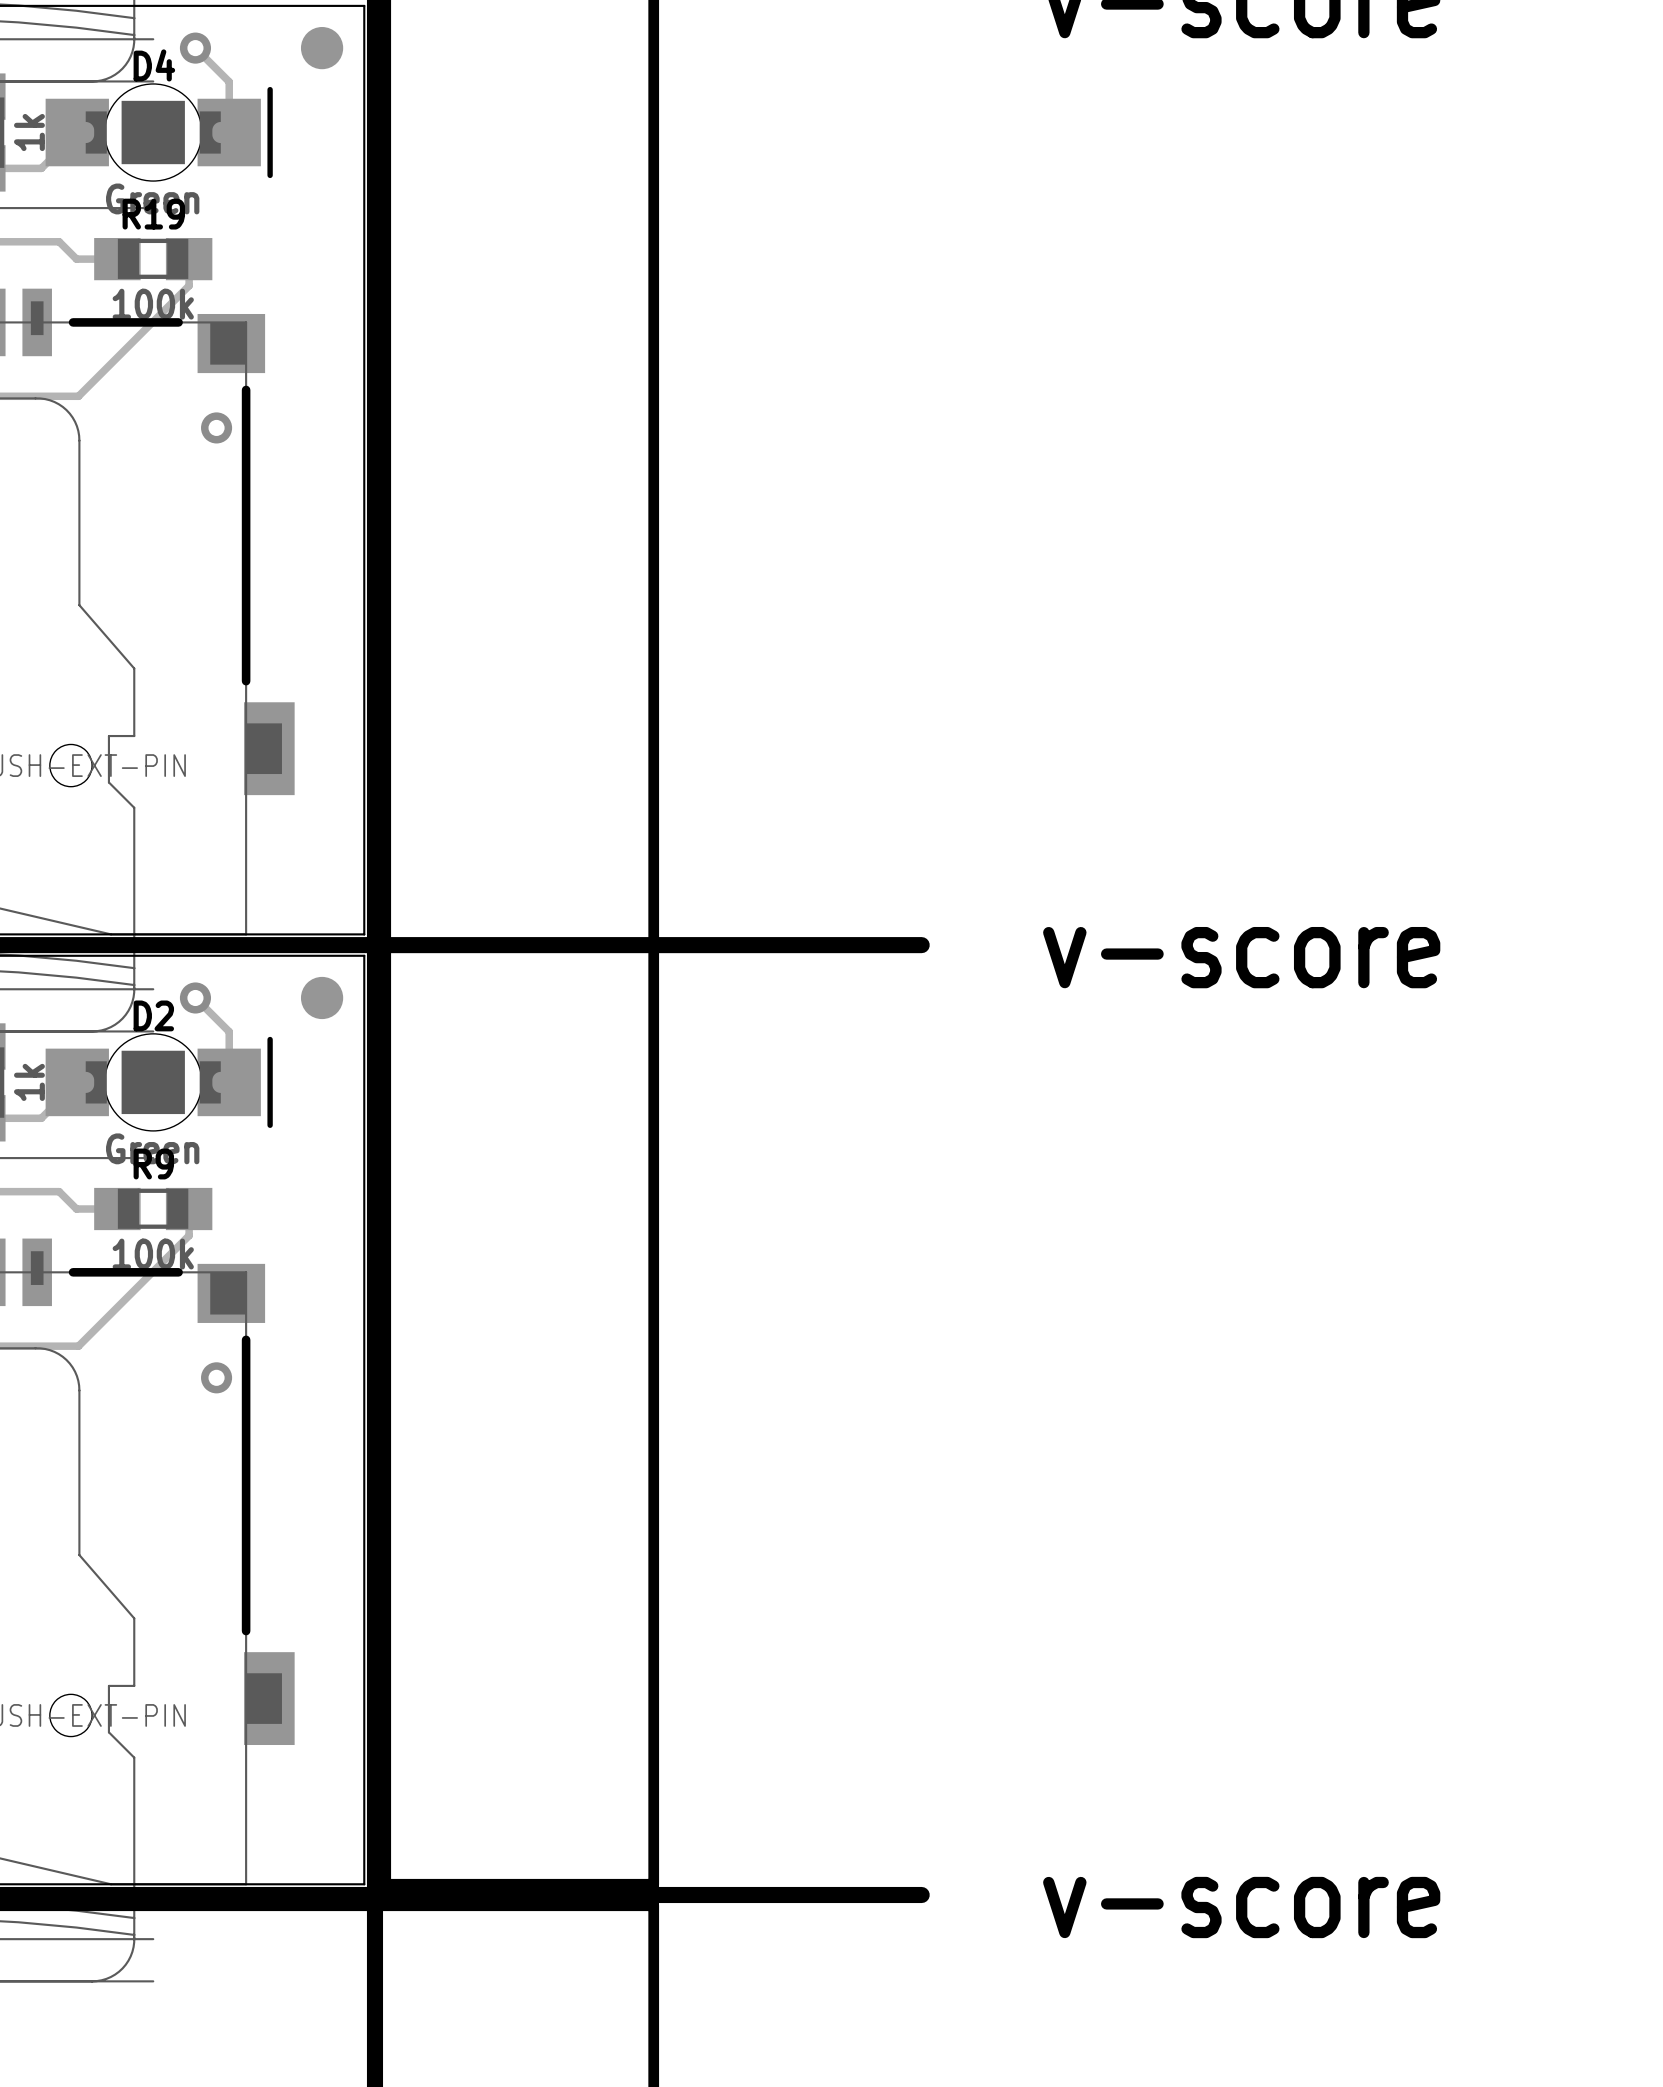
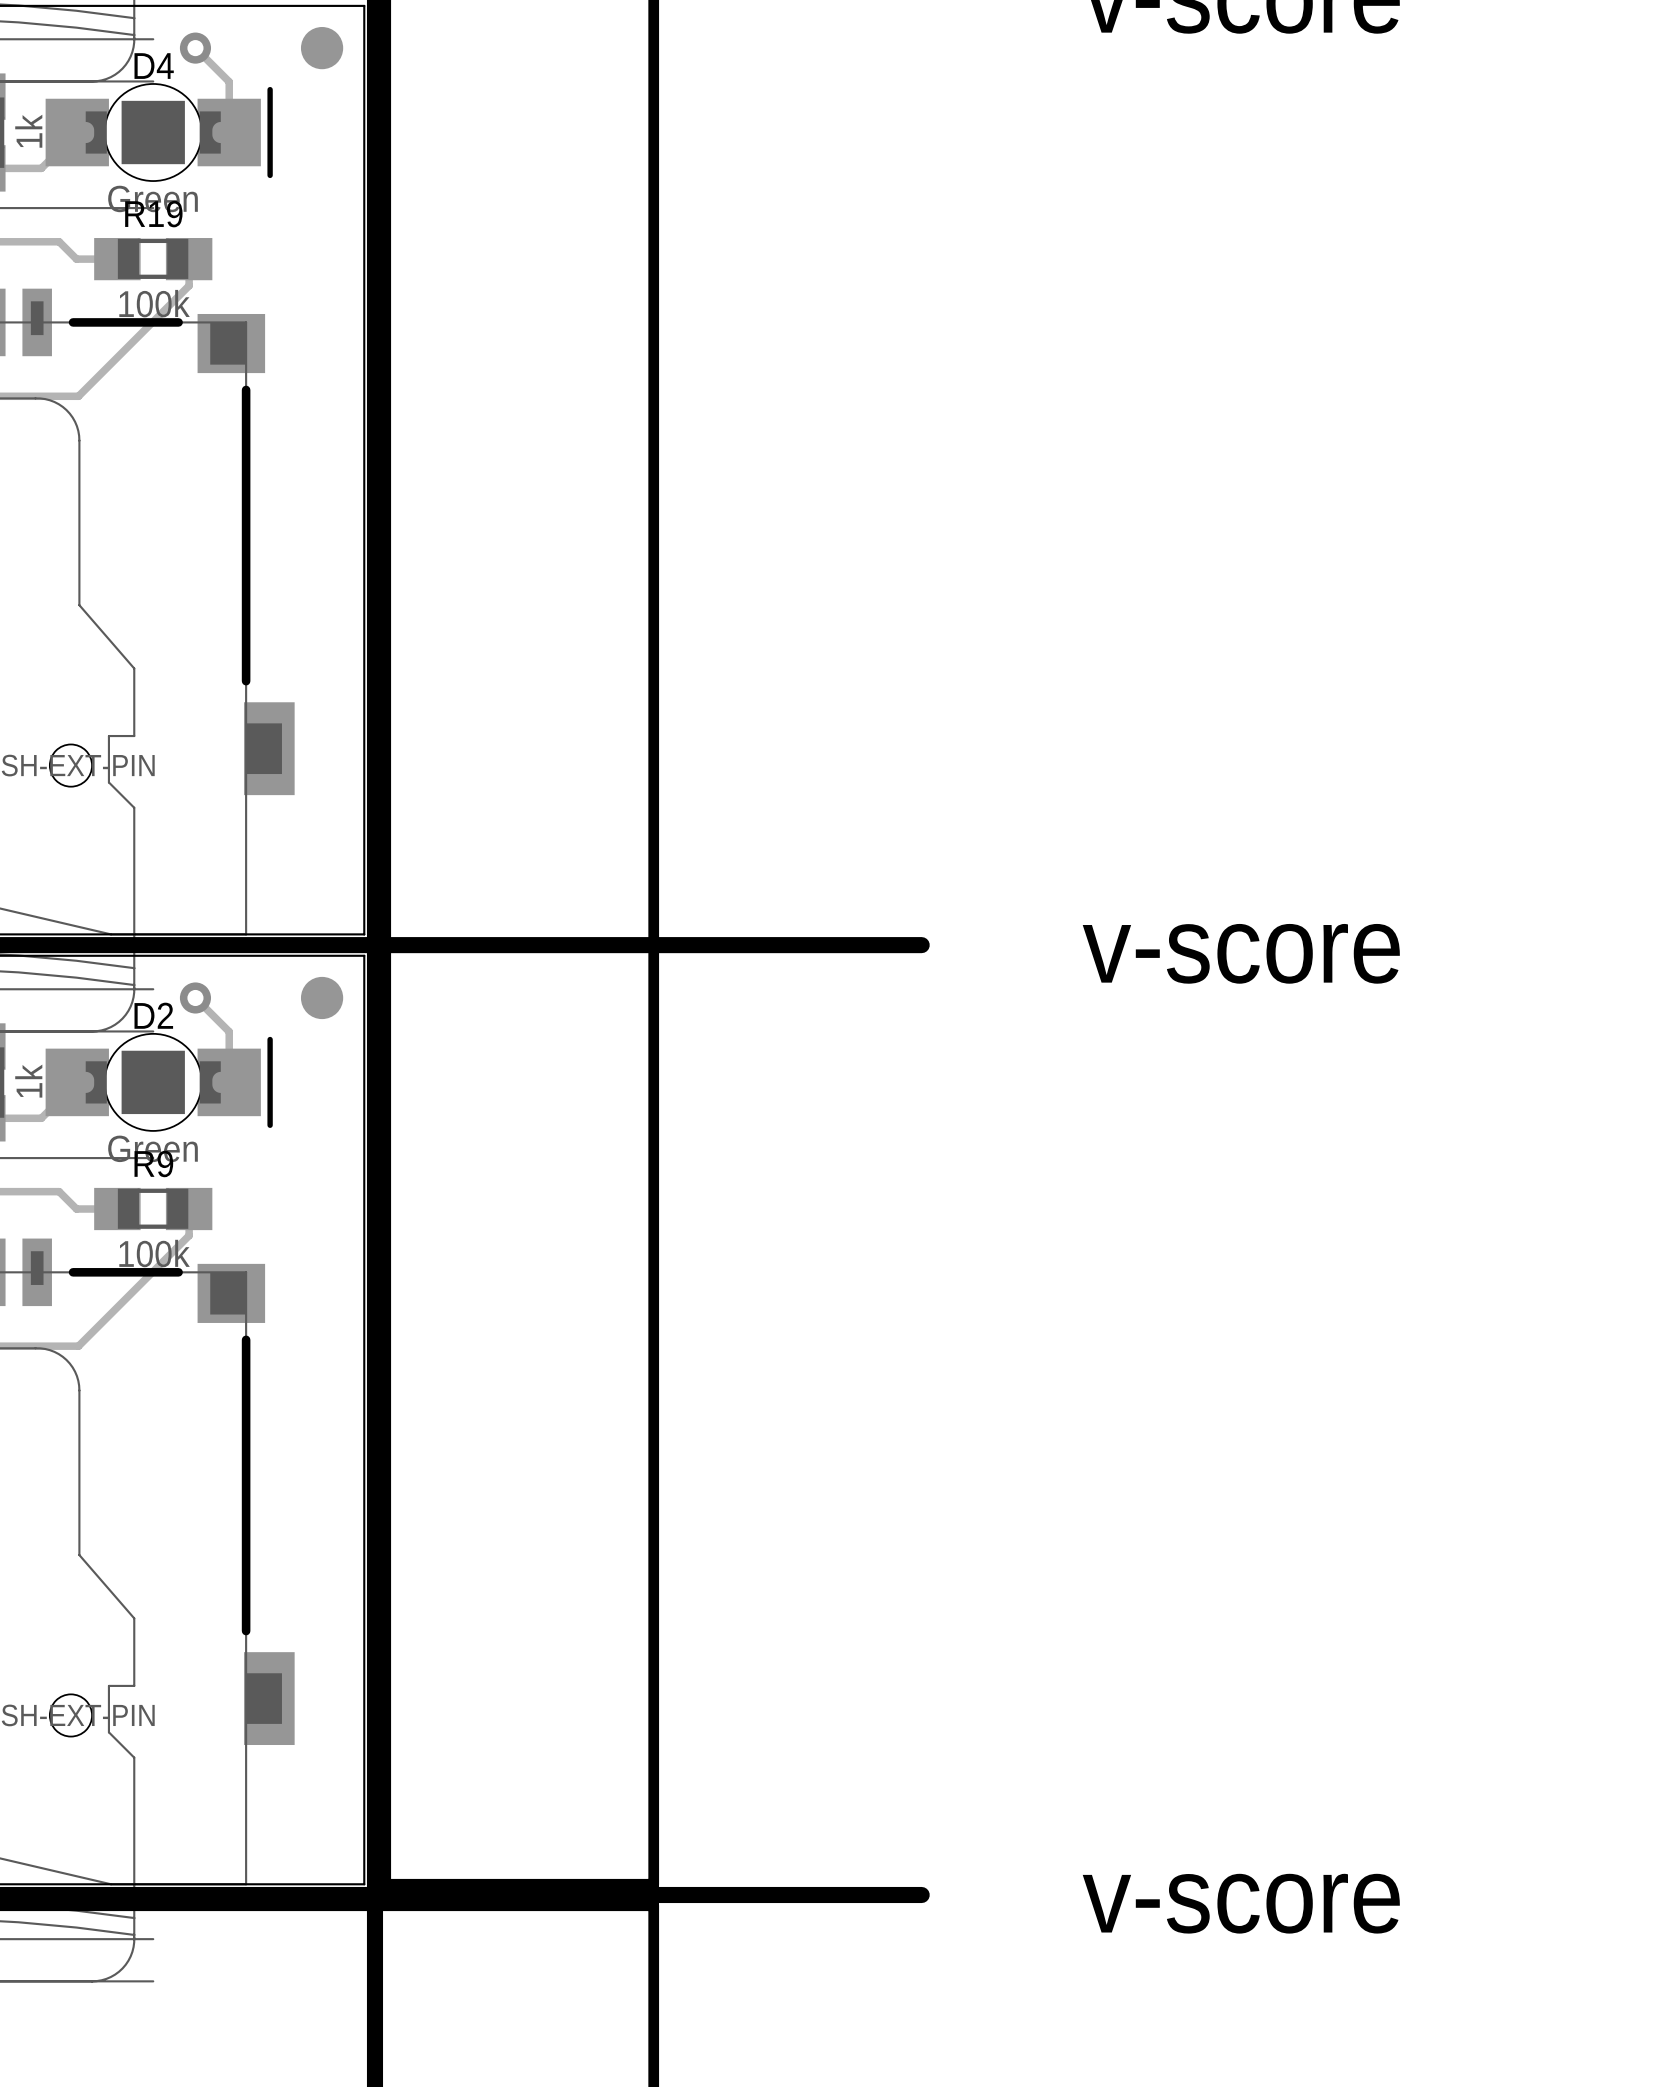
via: (216, 427) -> none
via: (216, 1377) -> none

